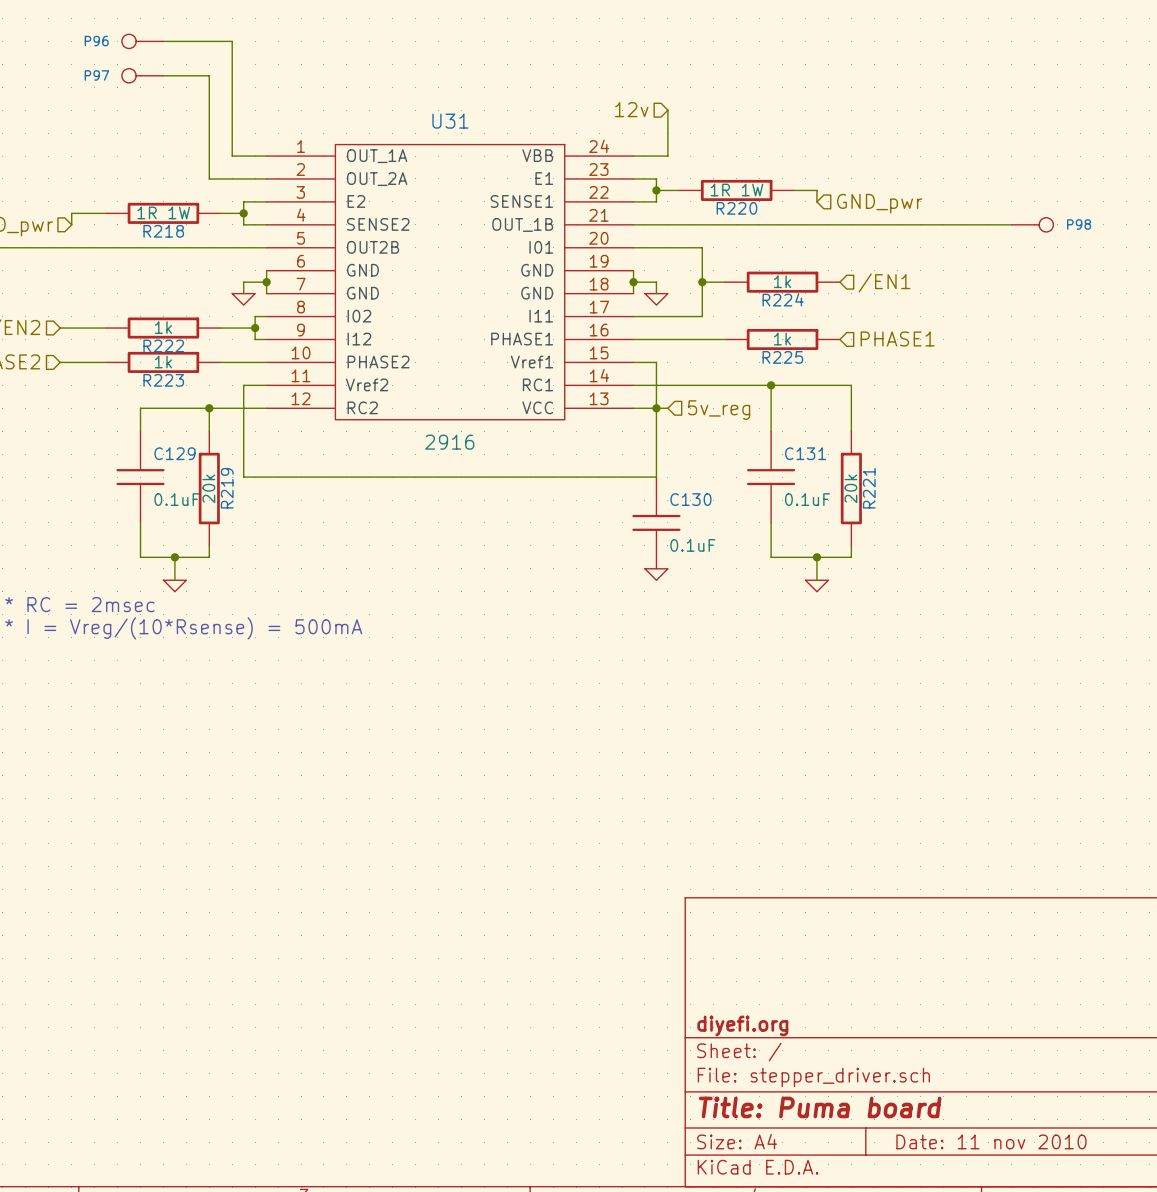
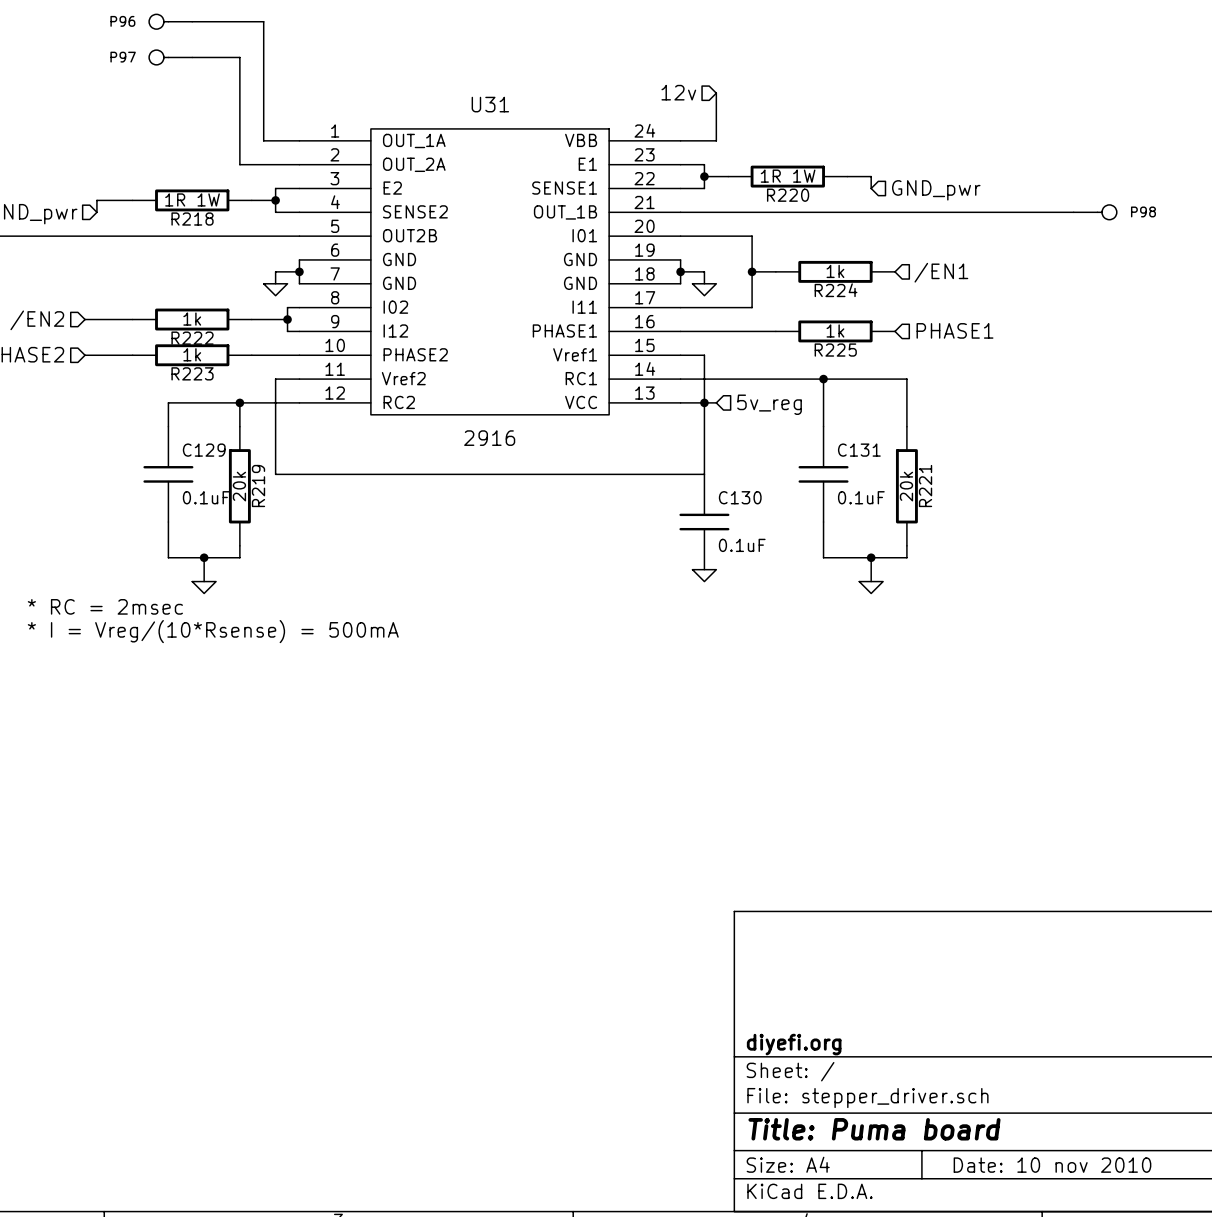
title block: Date: 11 nov 2010 (991, 1141) -> Date: 10 nov 2010 (1052, 1165)

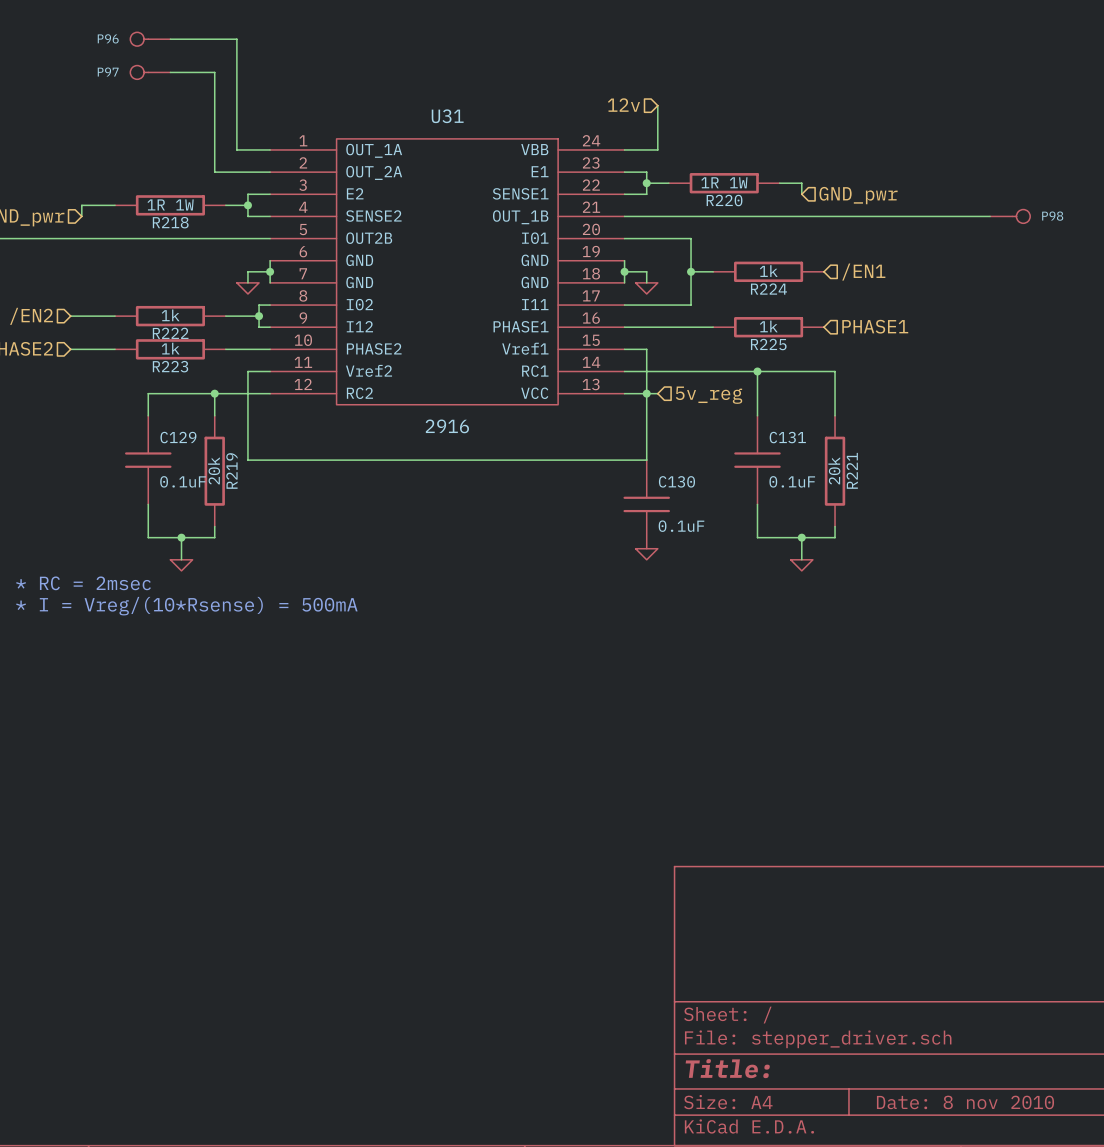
title block: diyefi.org (794, 1044) -> none
title block: Title: Puma board (874, 1129) -> Title: (727, 1068)
title block: Date: 10 nov 2010 (1052, 1165) -> Date: 8 nov 2010 (965, 1102)

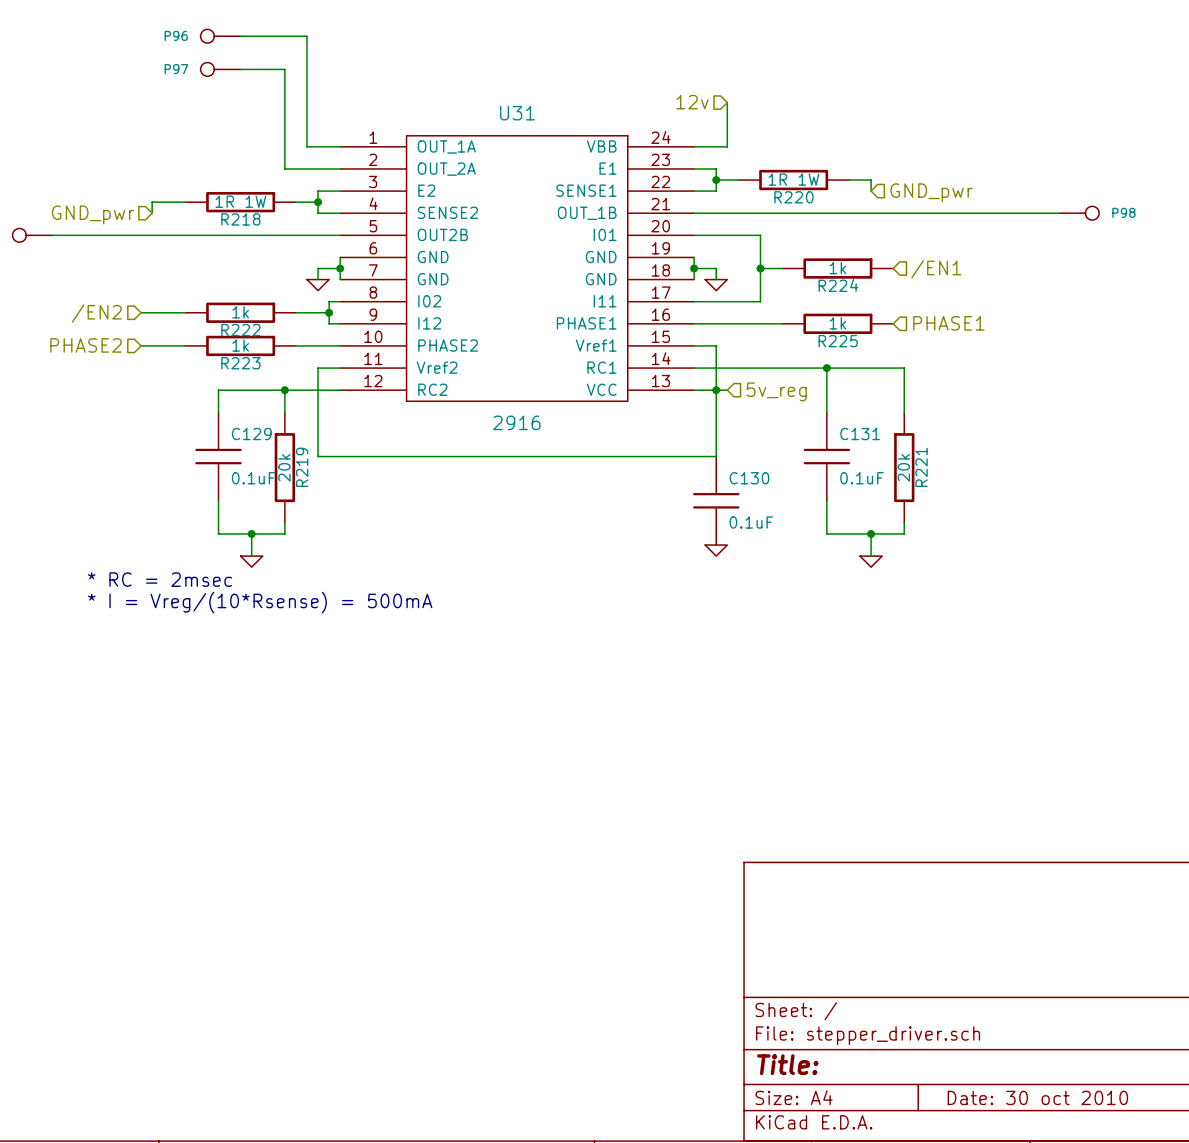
title block: Date: 8 nov 2010 (965, 1102) -> Date: 30 oct 2010 (1037, 1097)

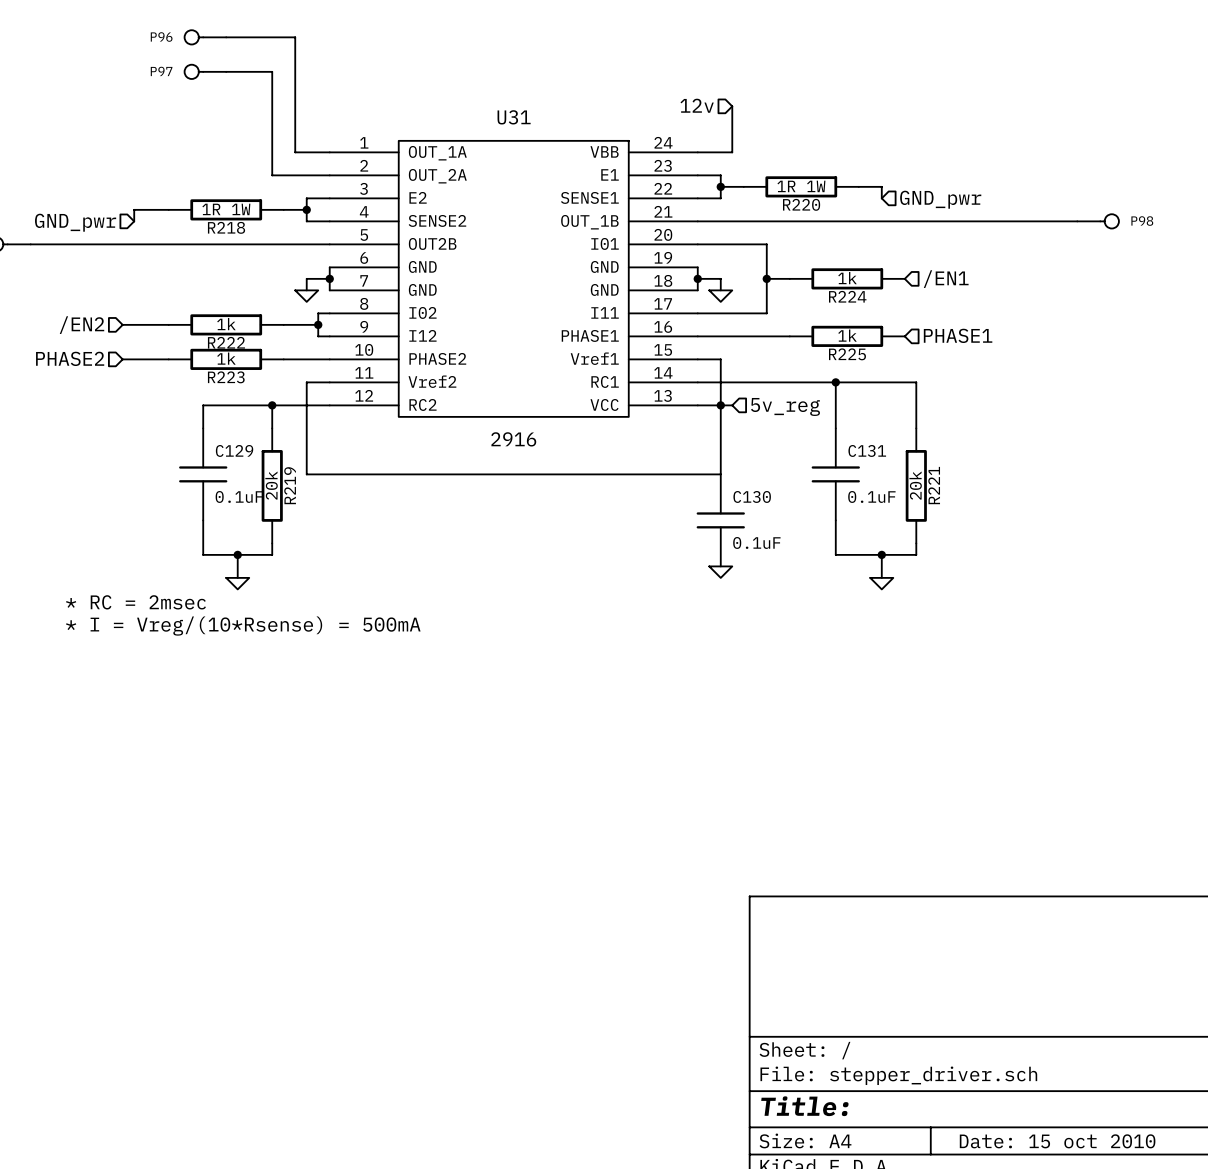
title block: Date: 30 oct 2010 (1037, 1097) -> Date: 15 oct 2010 (1057, 1141)

